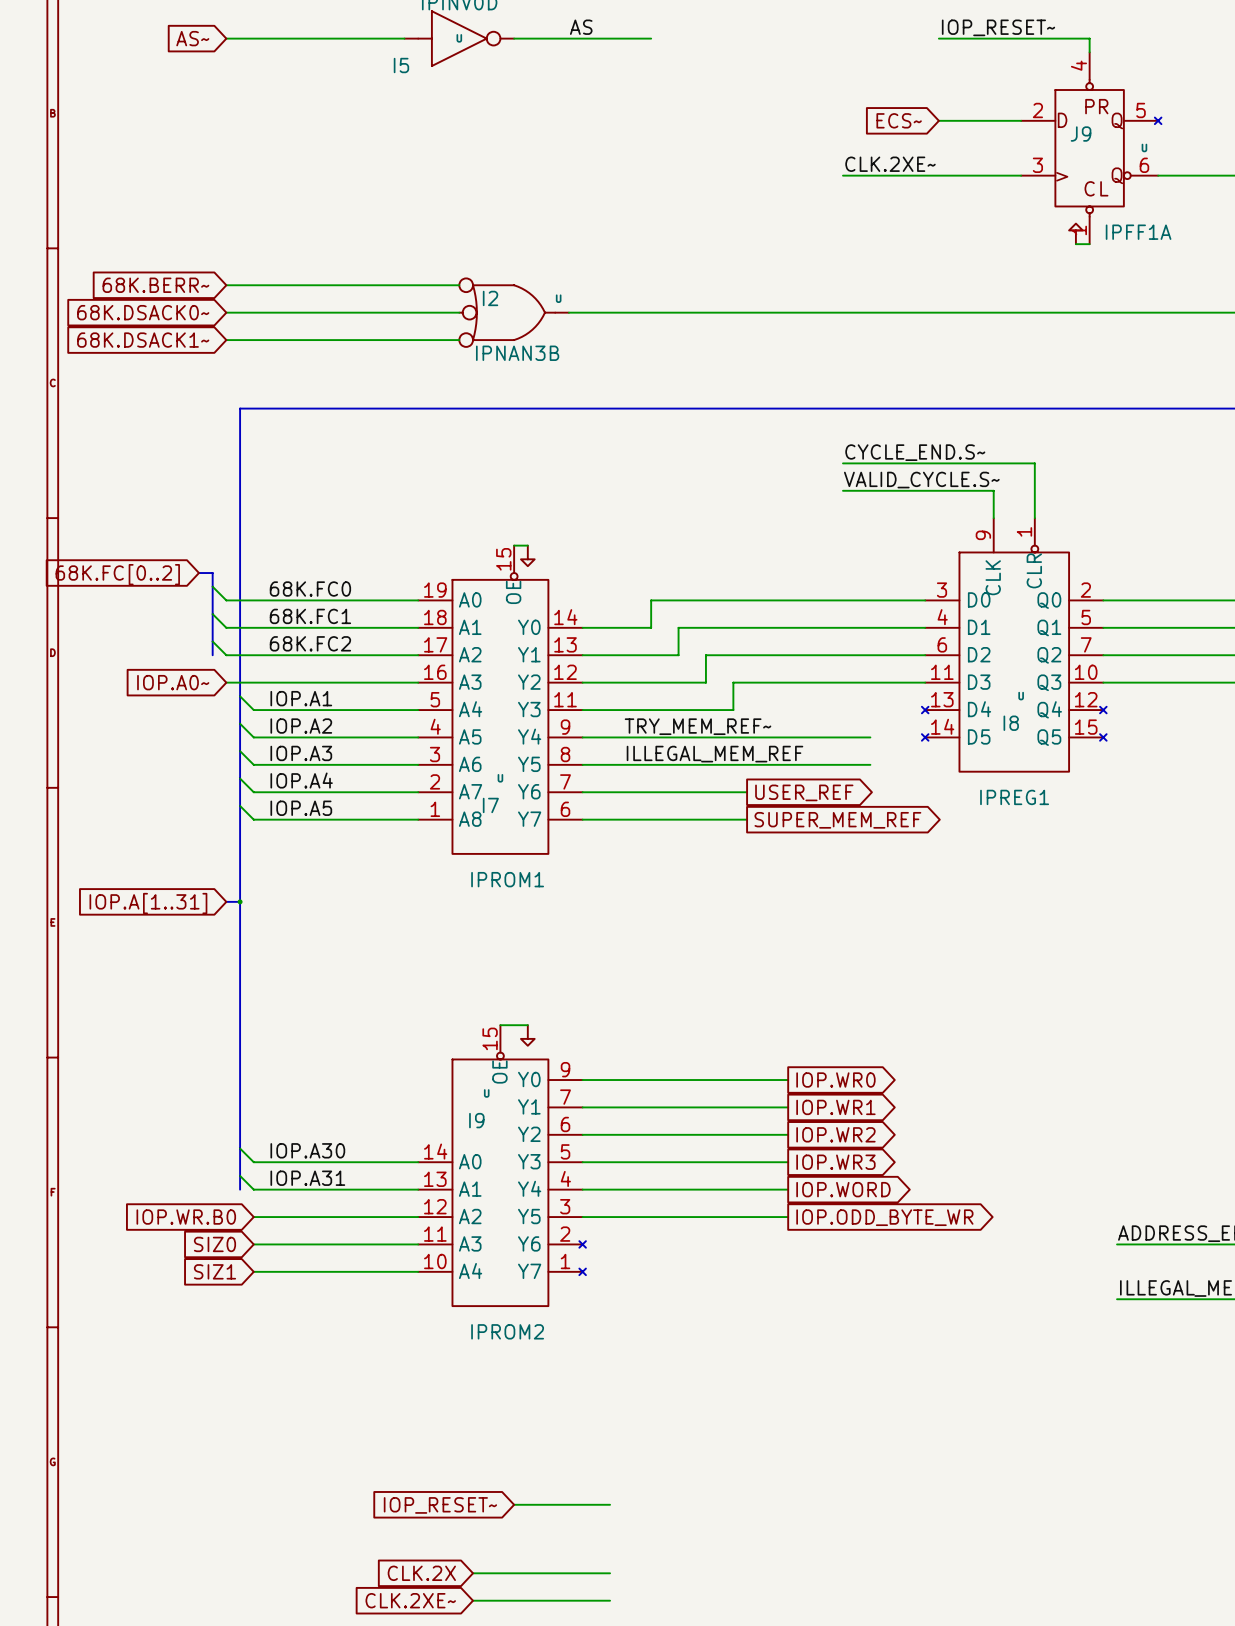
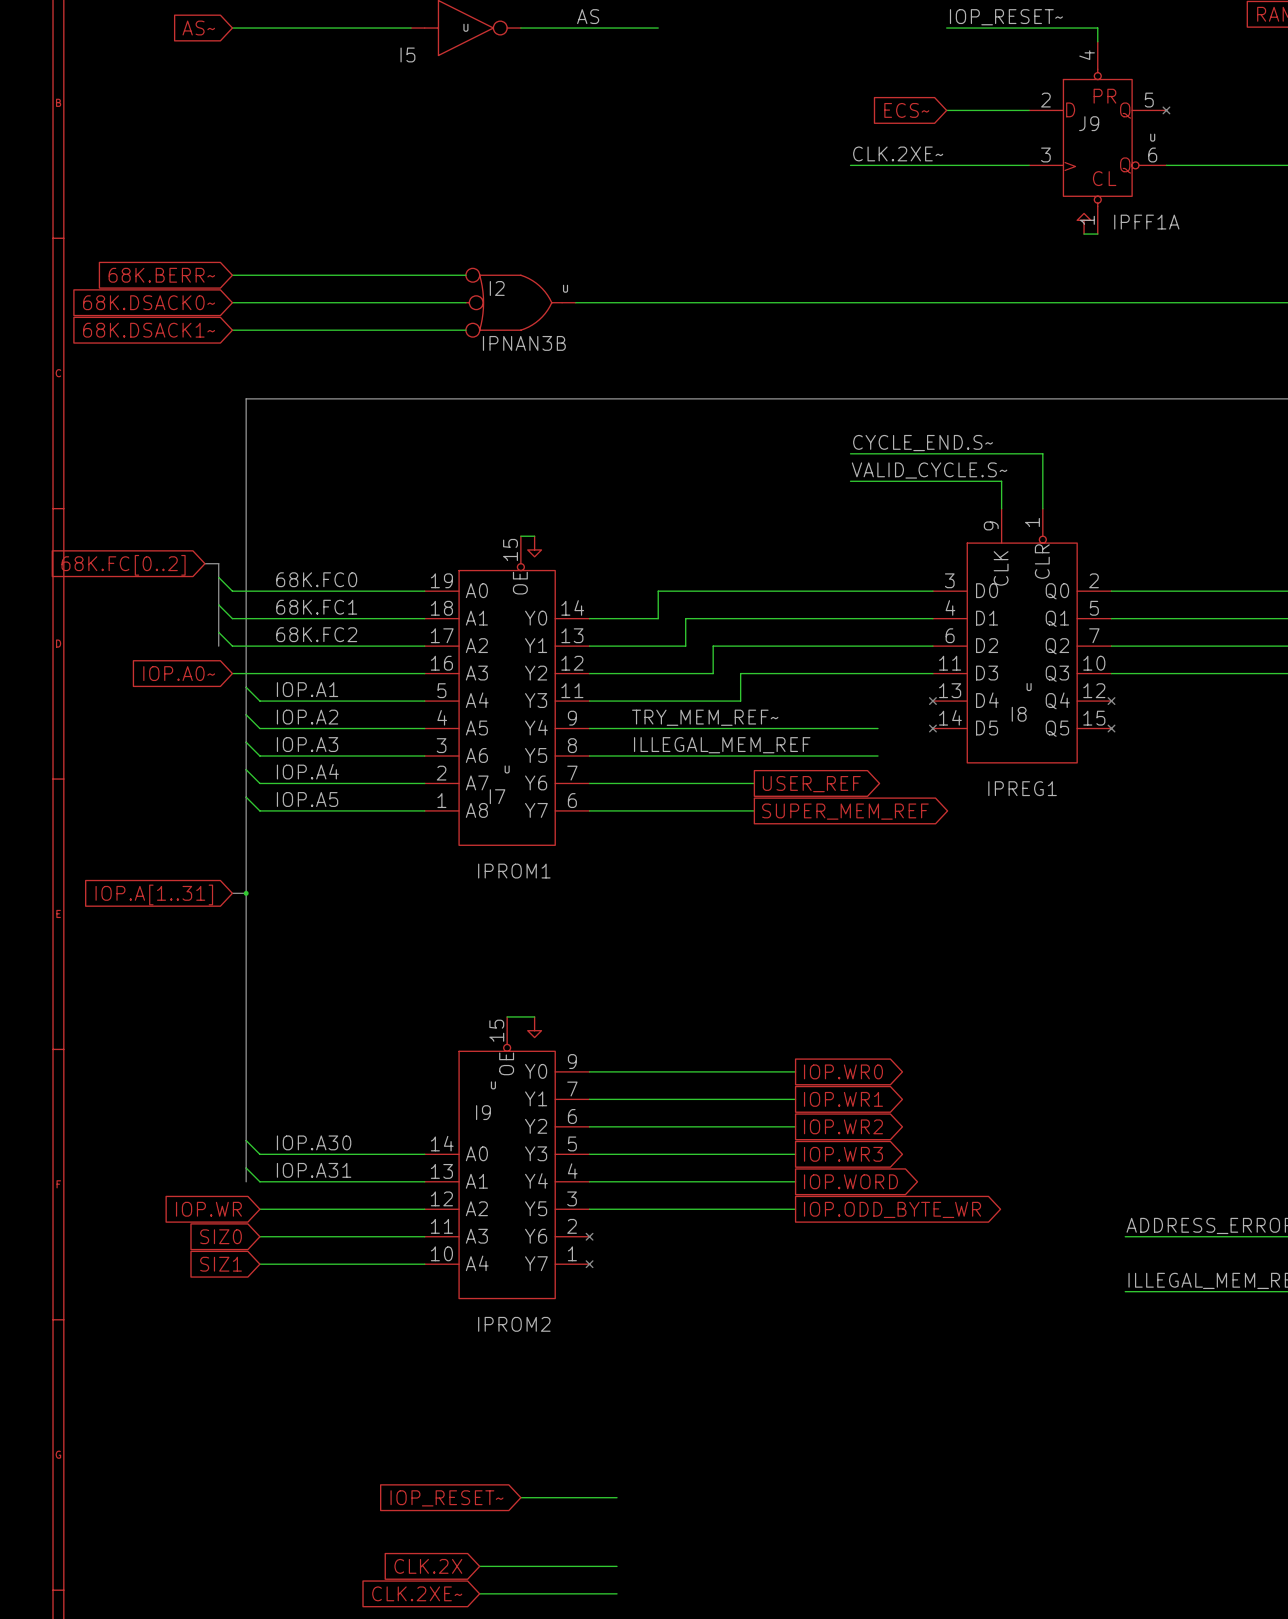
global label: IOP.WR.B0 (186, 1217) -> IOP.WR (208, 1209)

